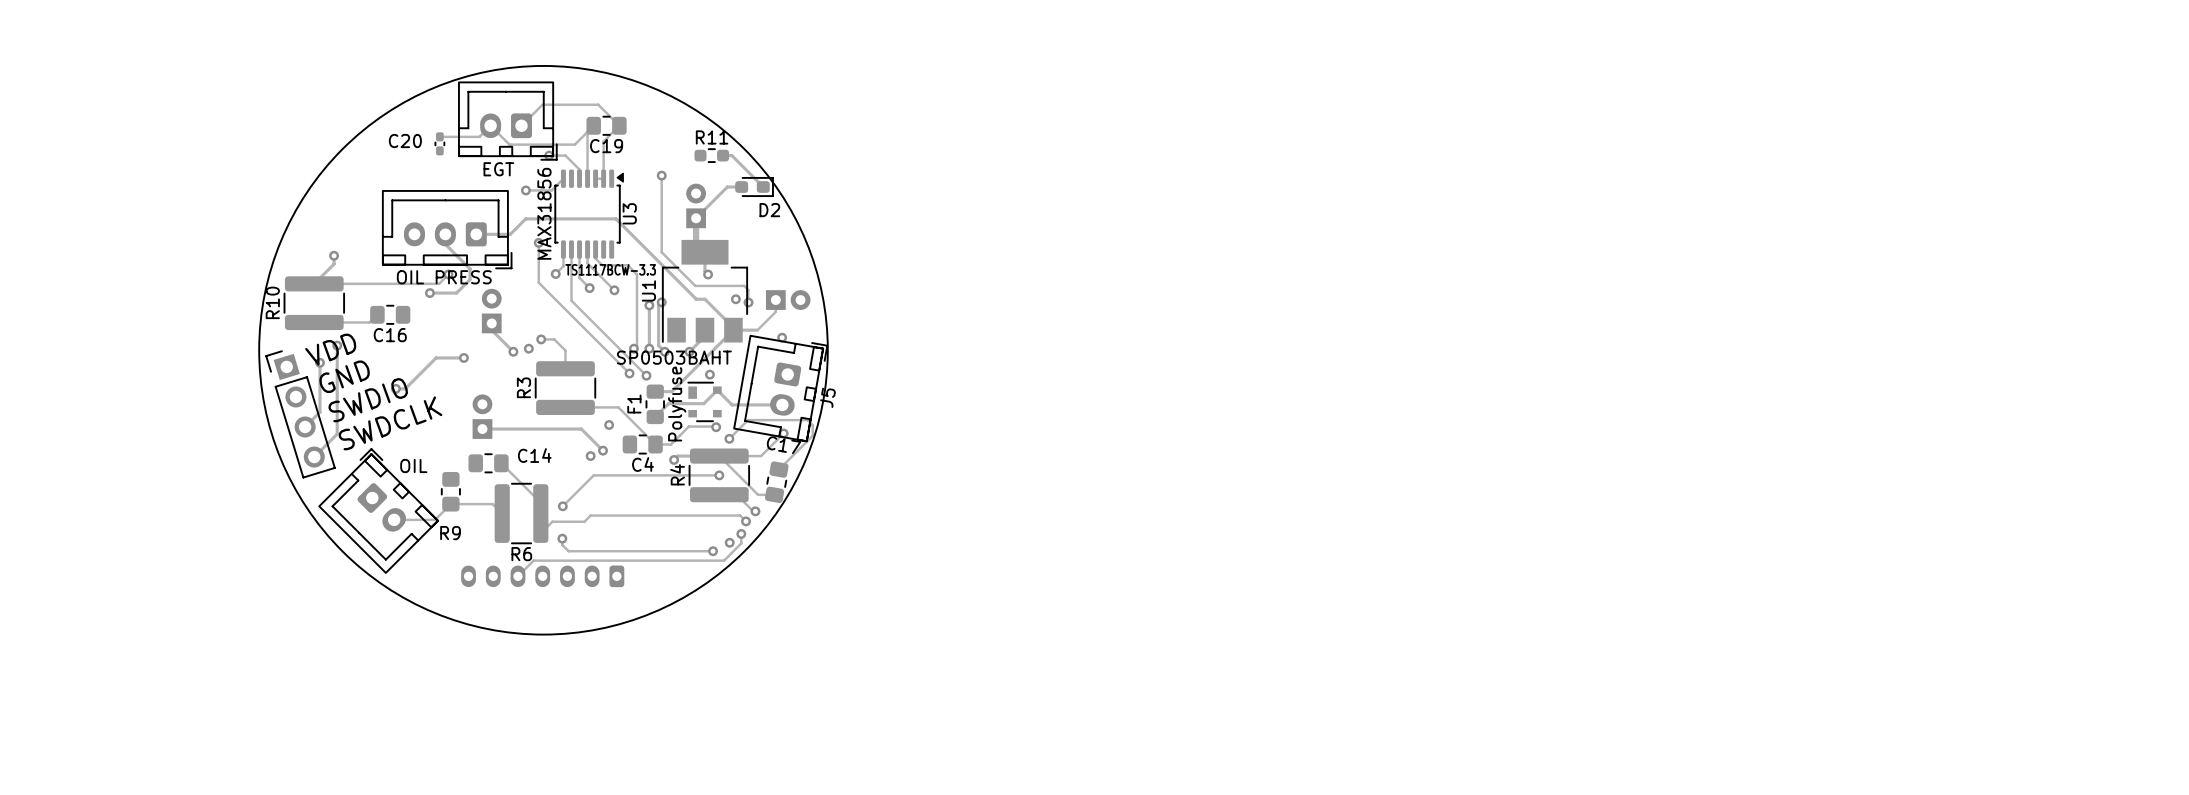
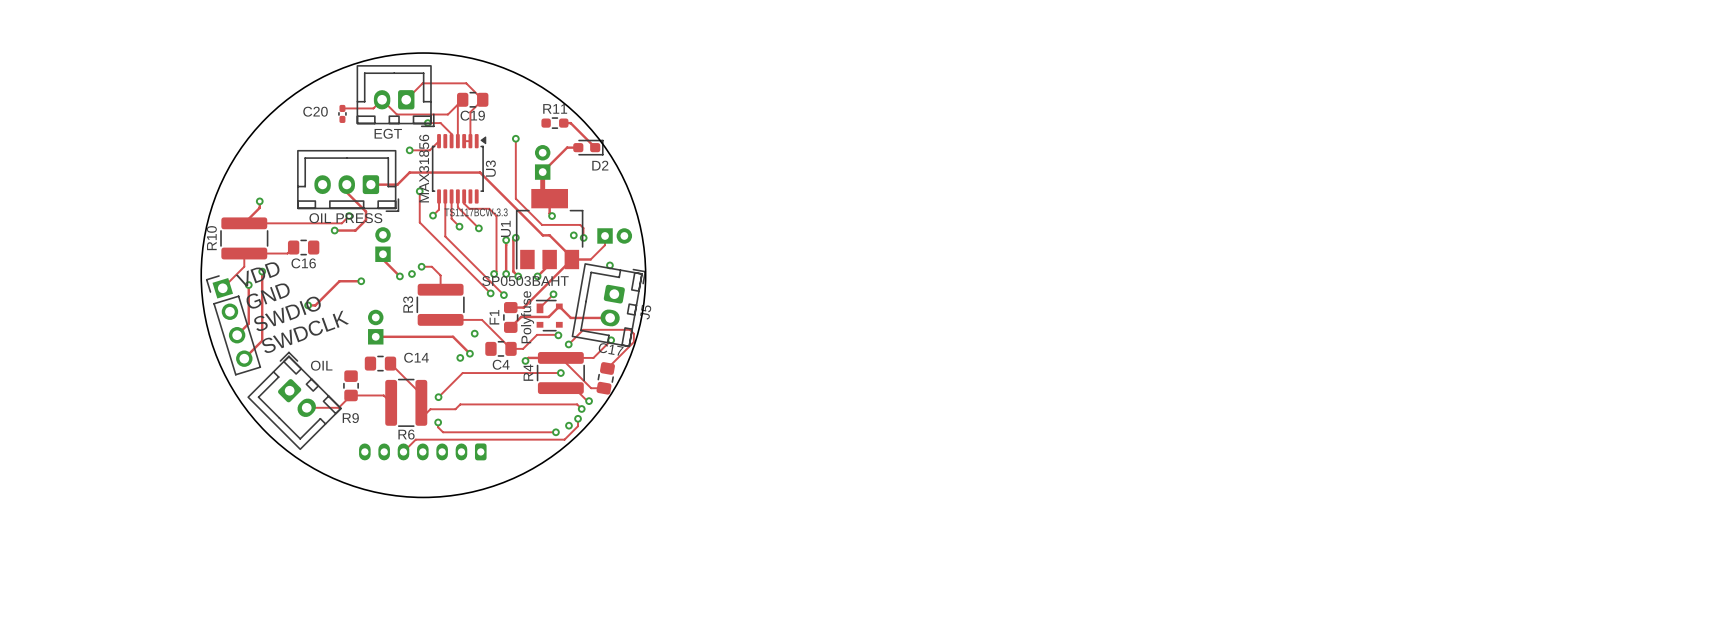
track: none -> (244, 253) (244, 266) (222, 288)
track: none -> (553, 294) (539, 308)

